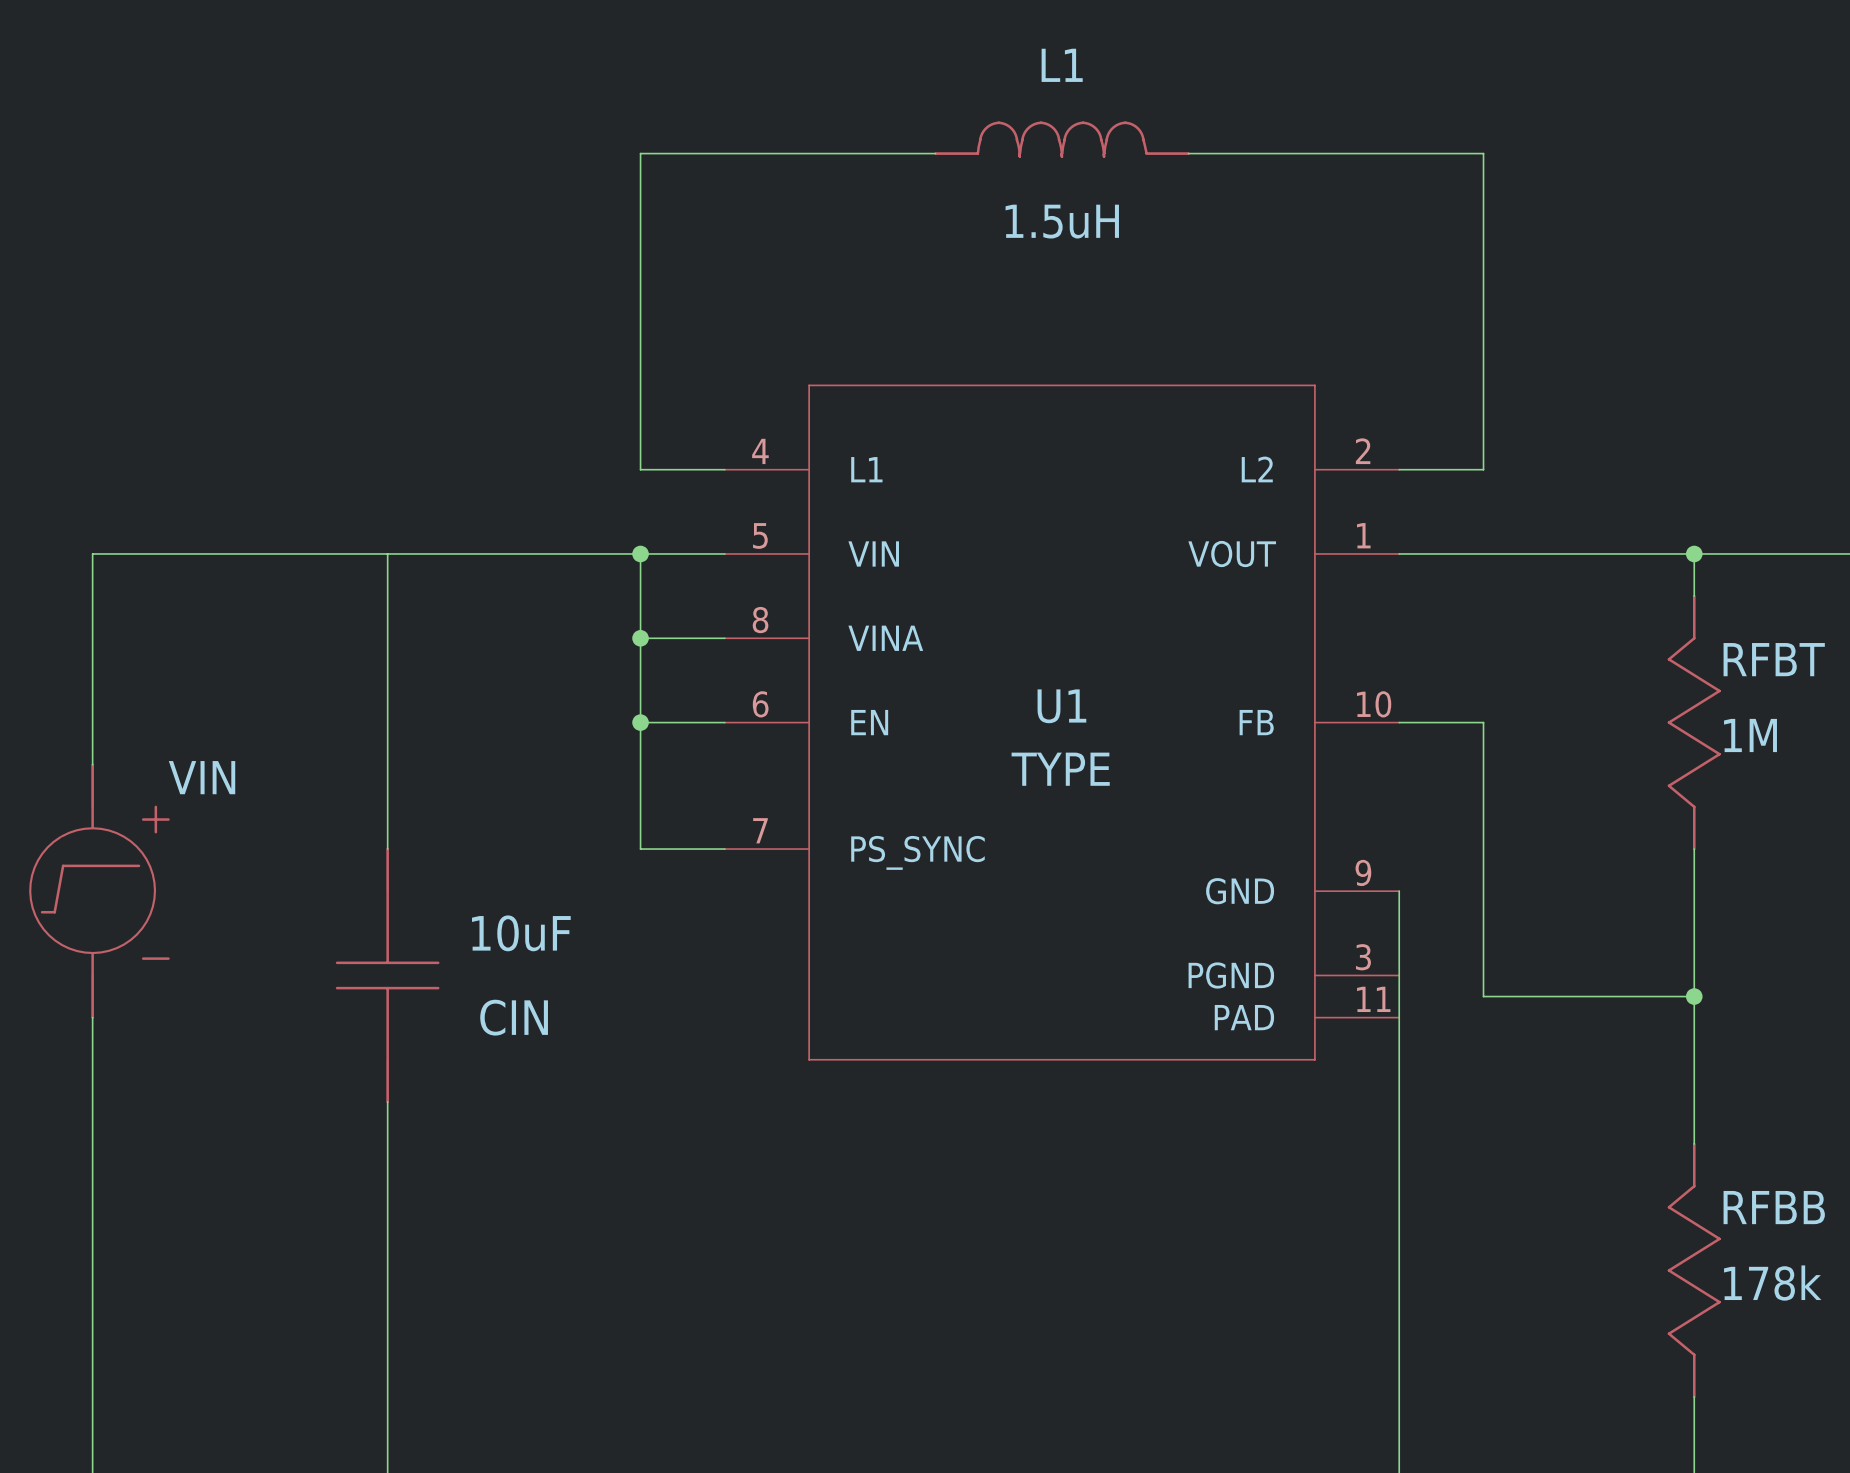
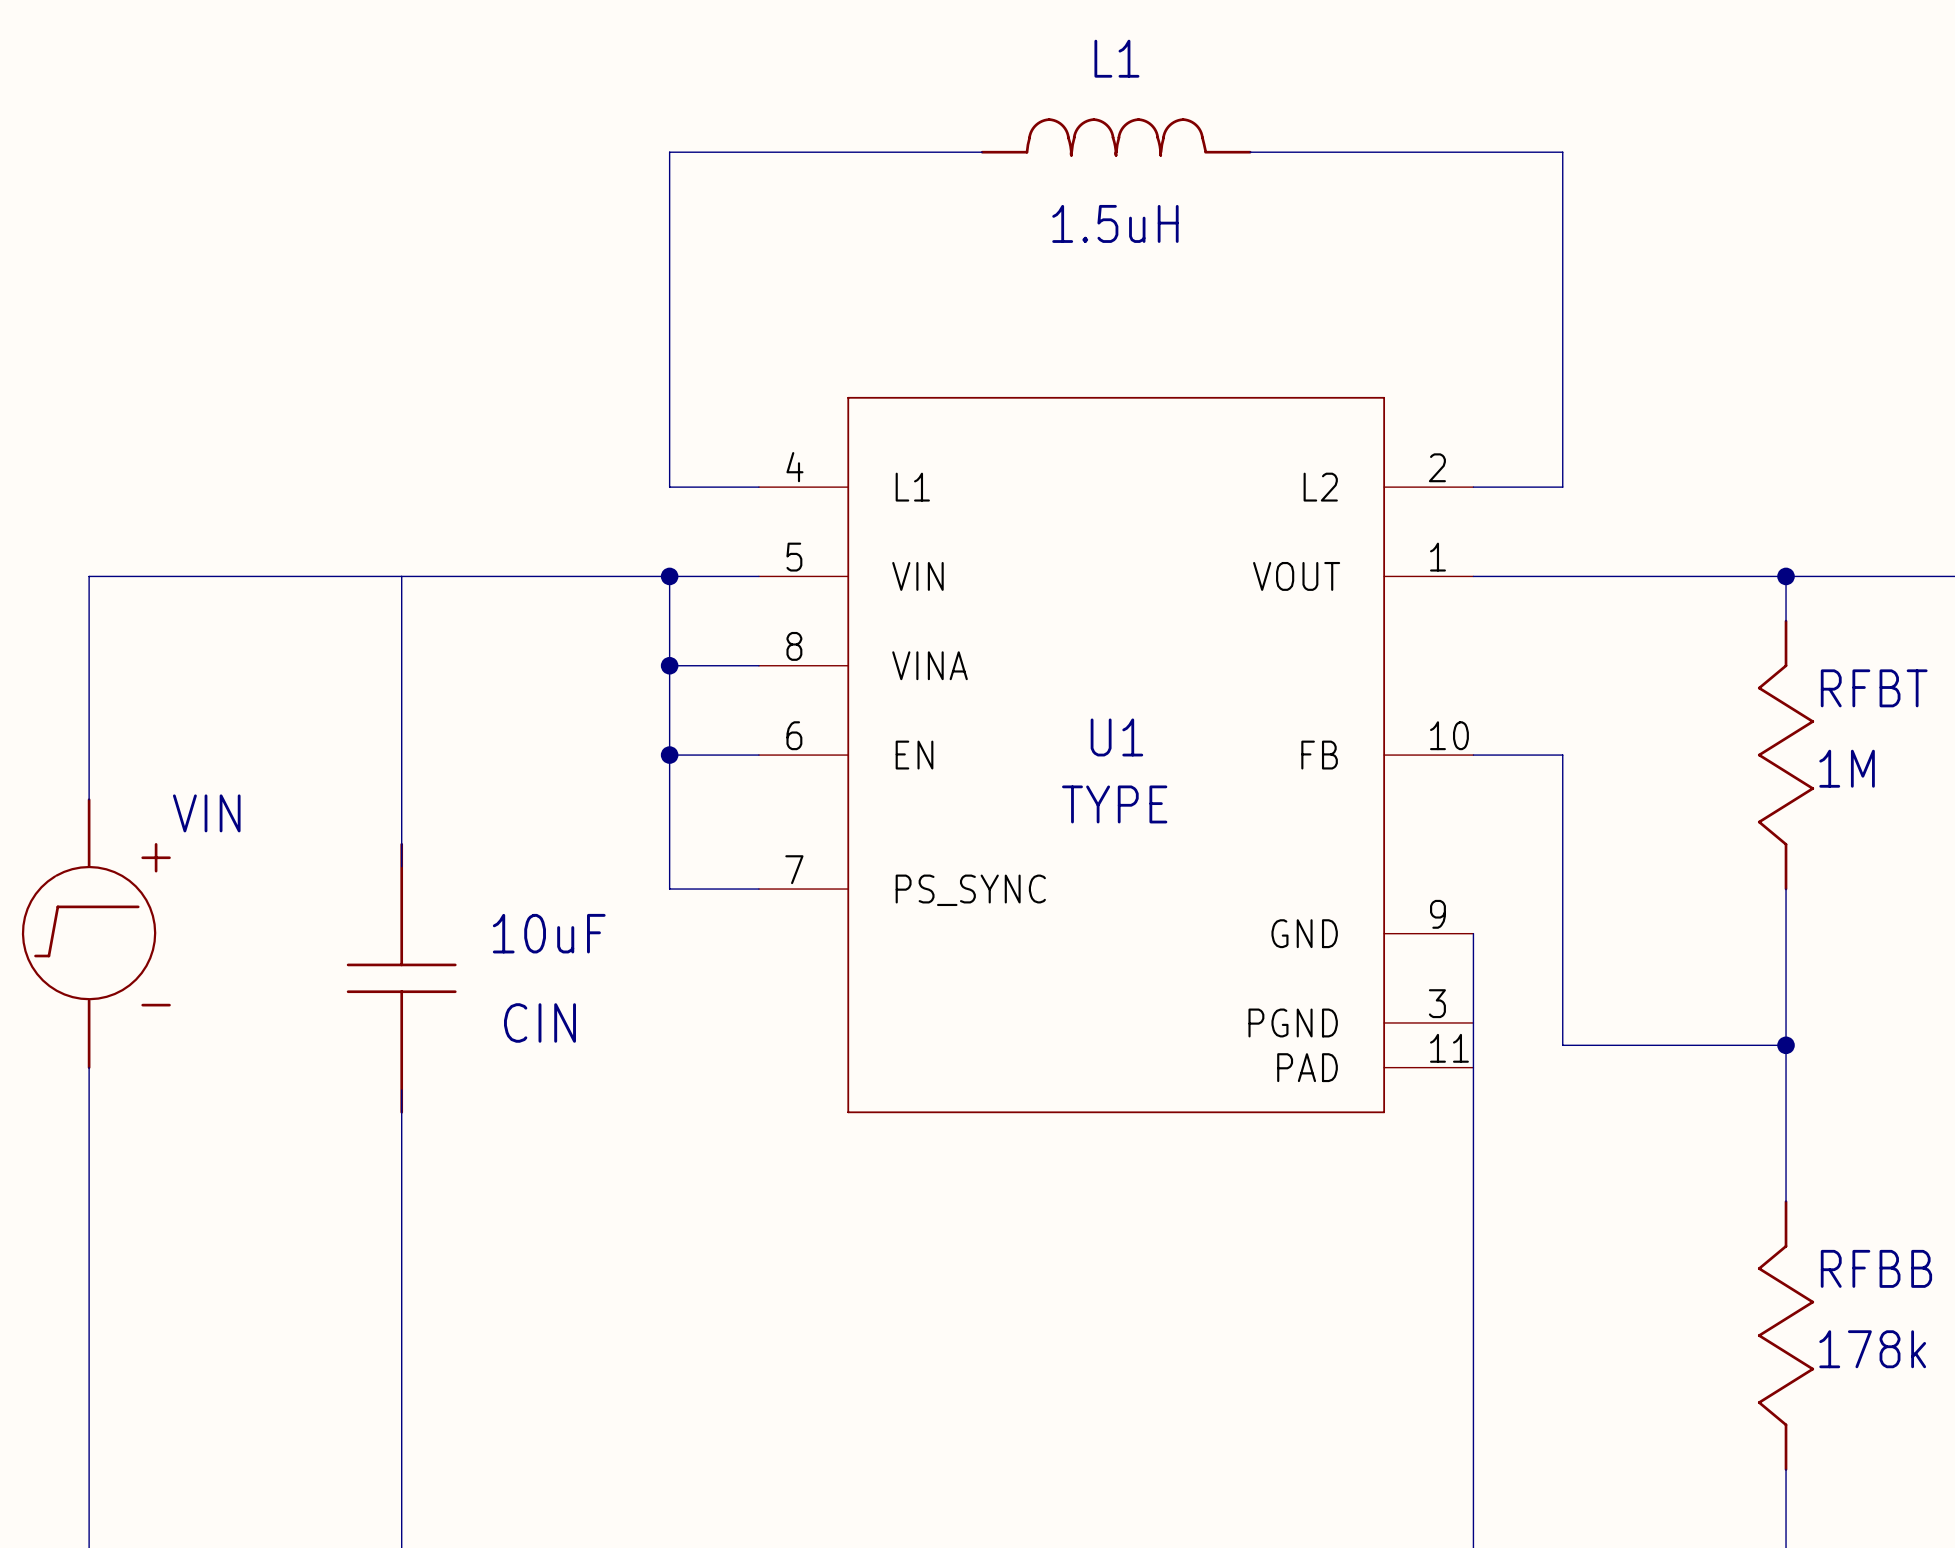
CIN position: (387, 975) -> (401, 978)

